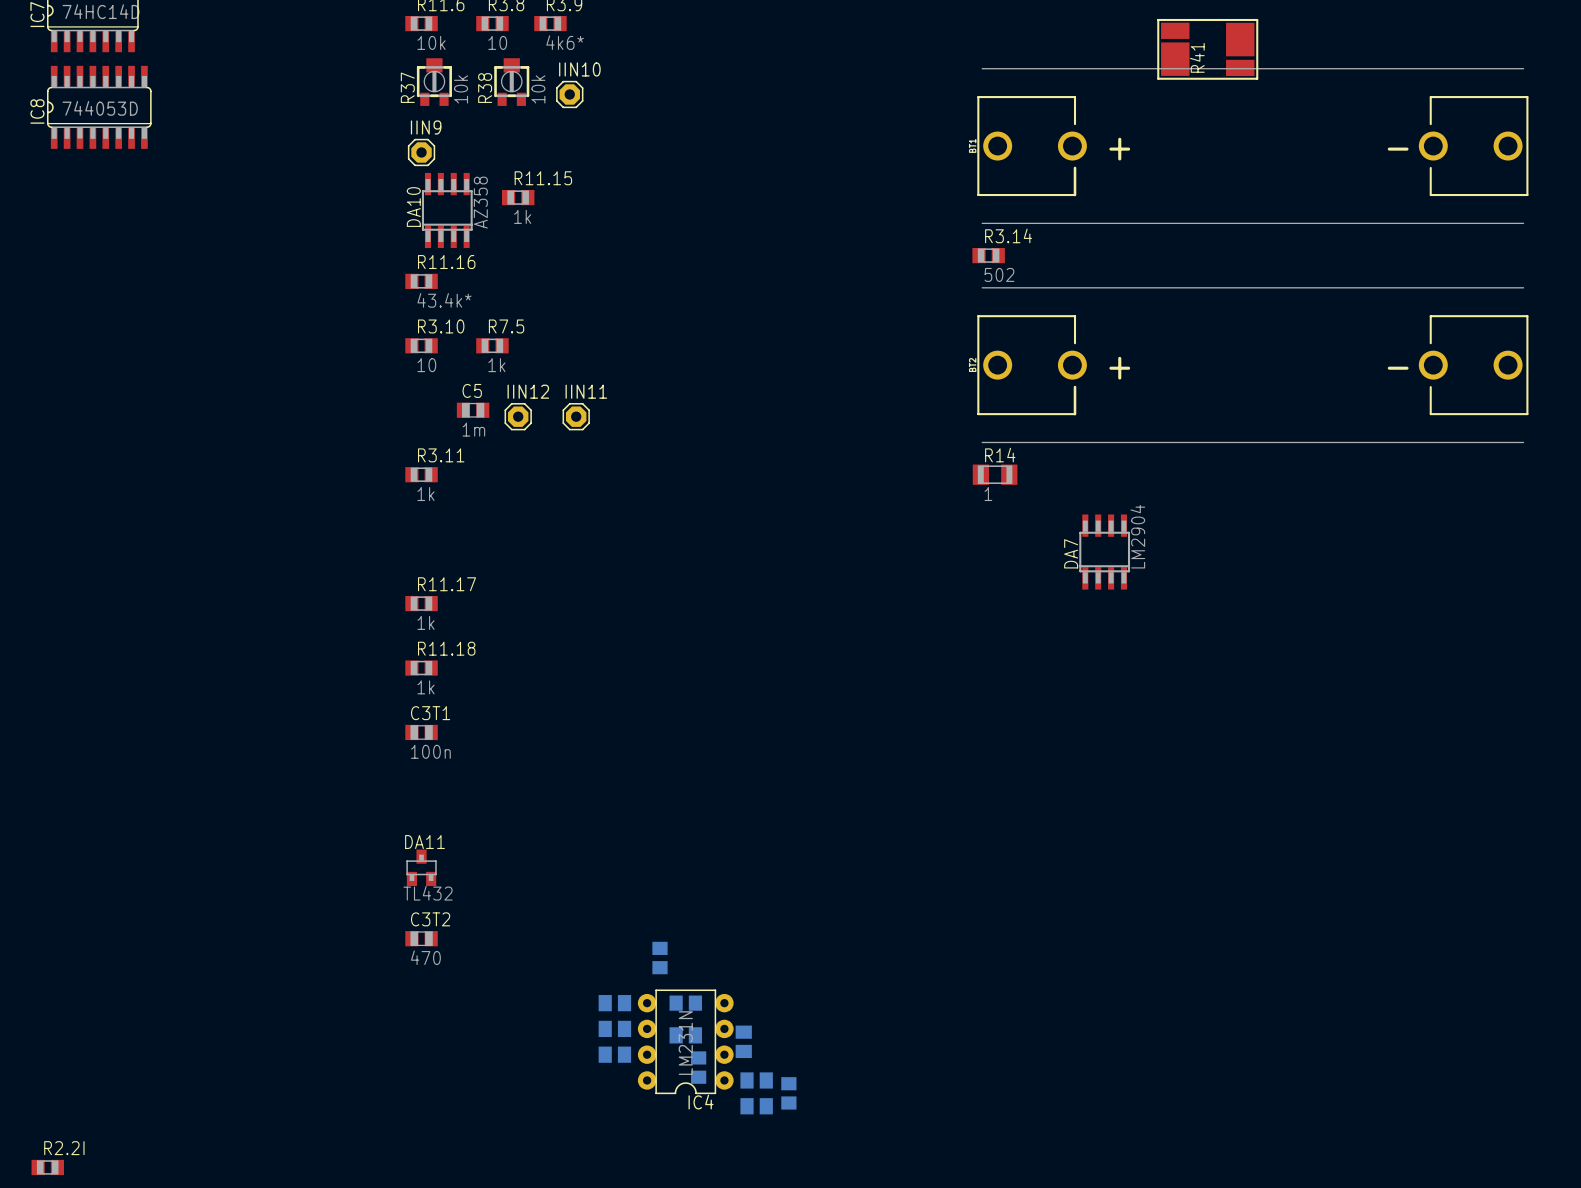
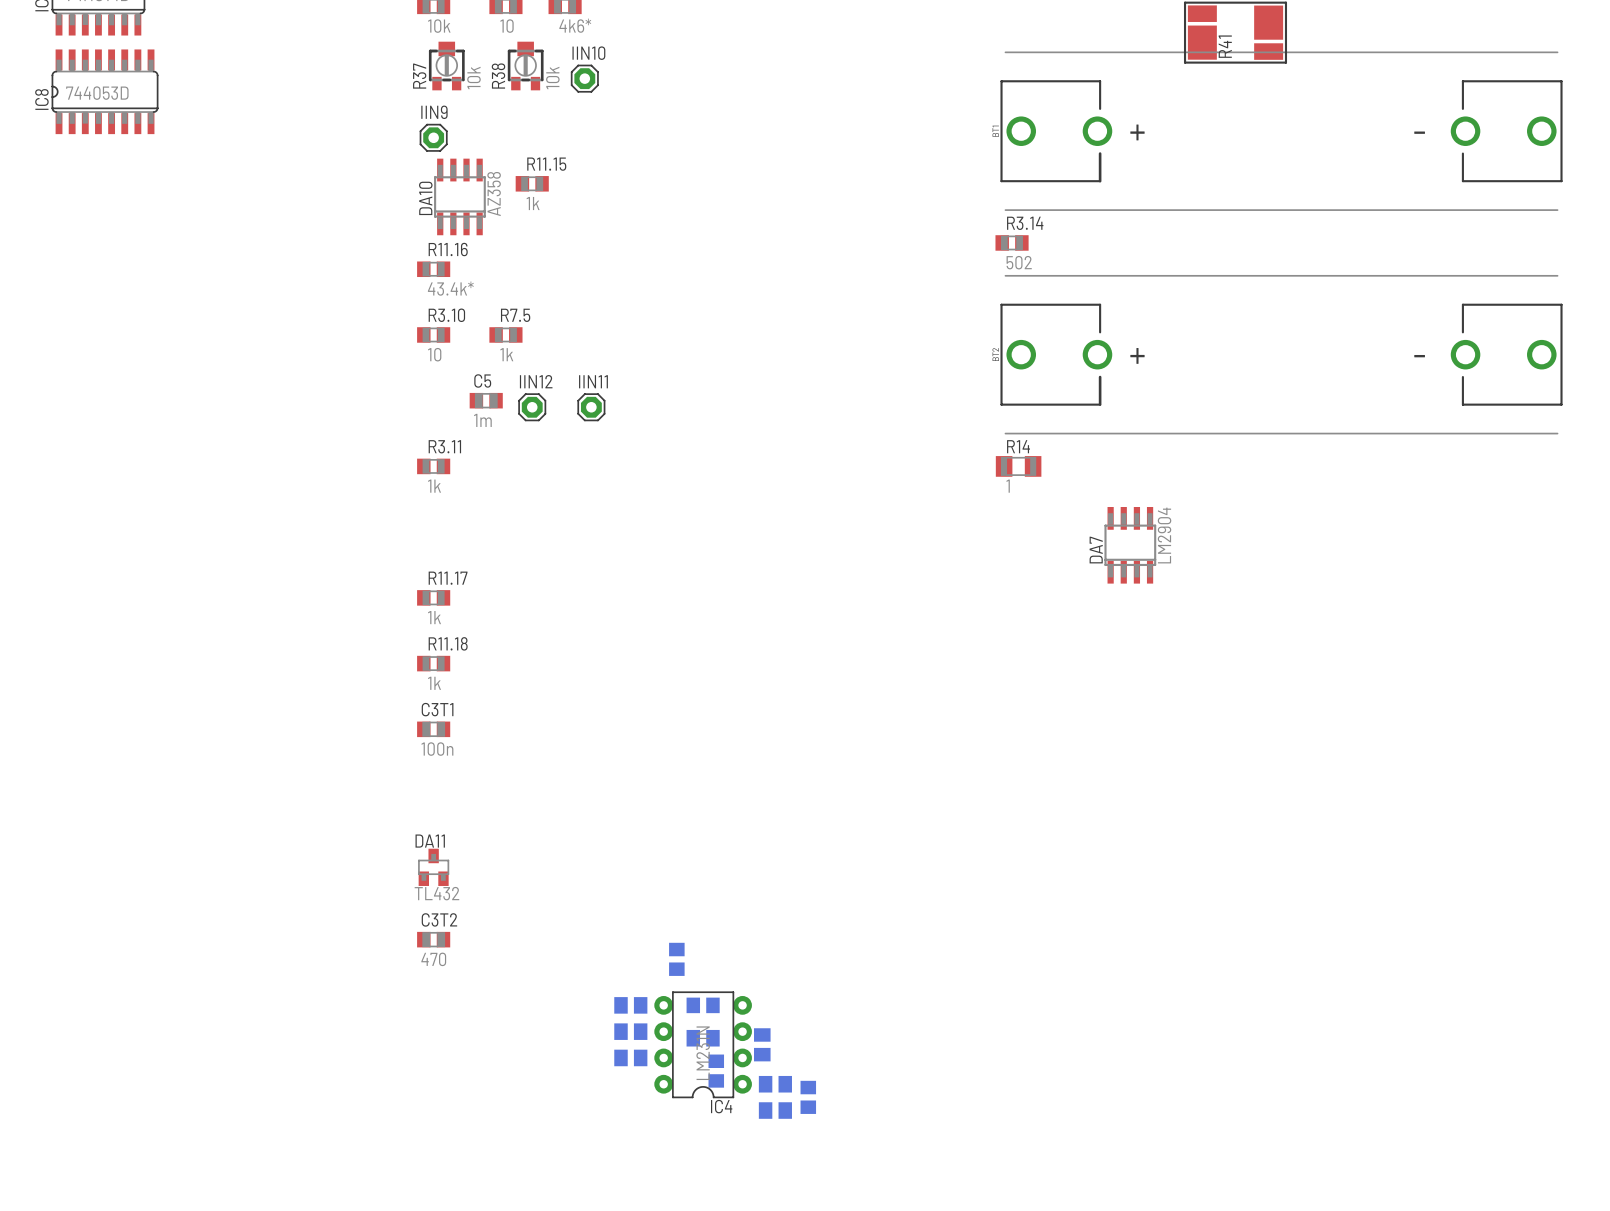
R2.2I: (47, 1167) -> none

